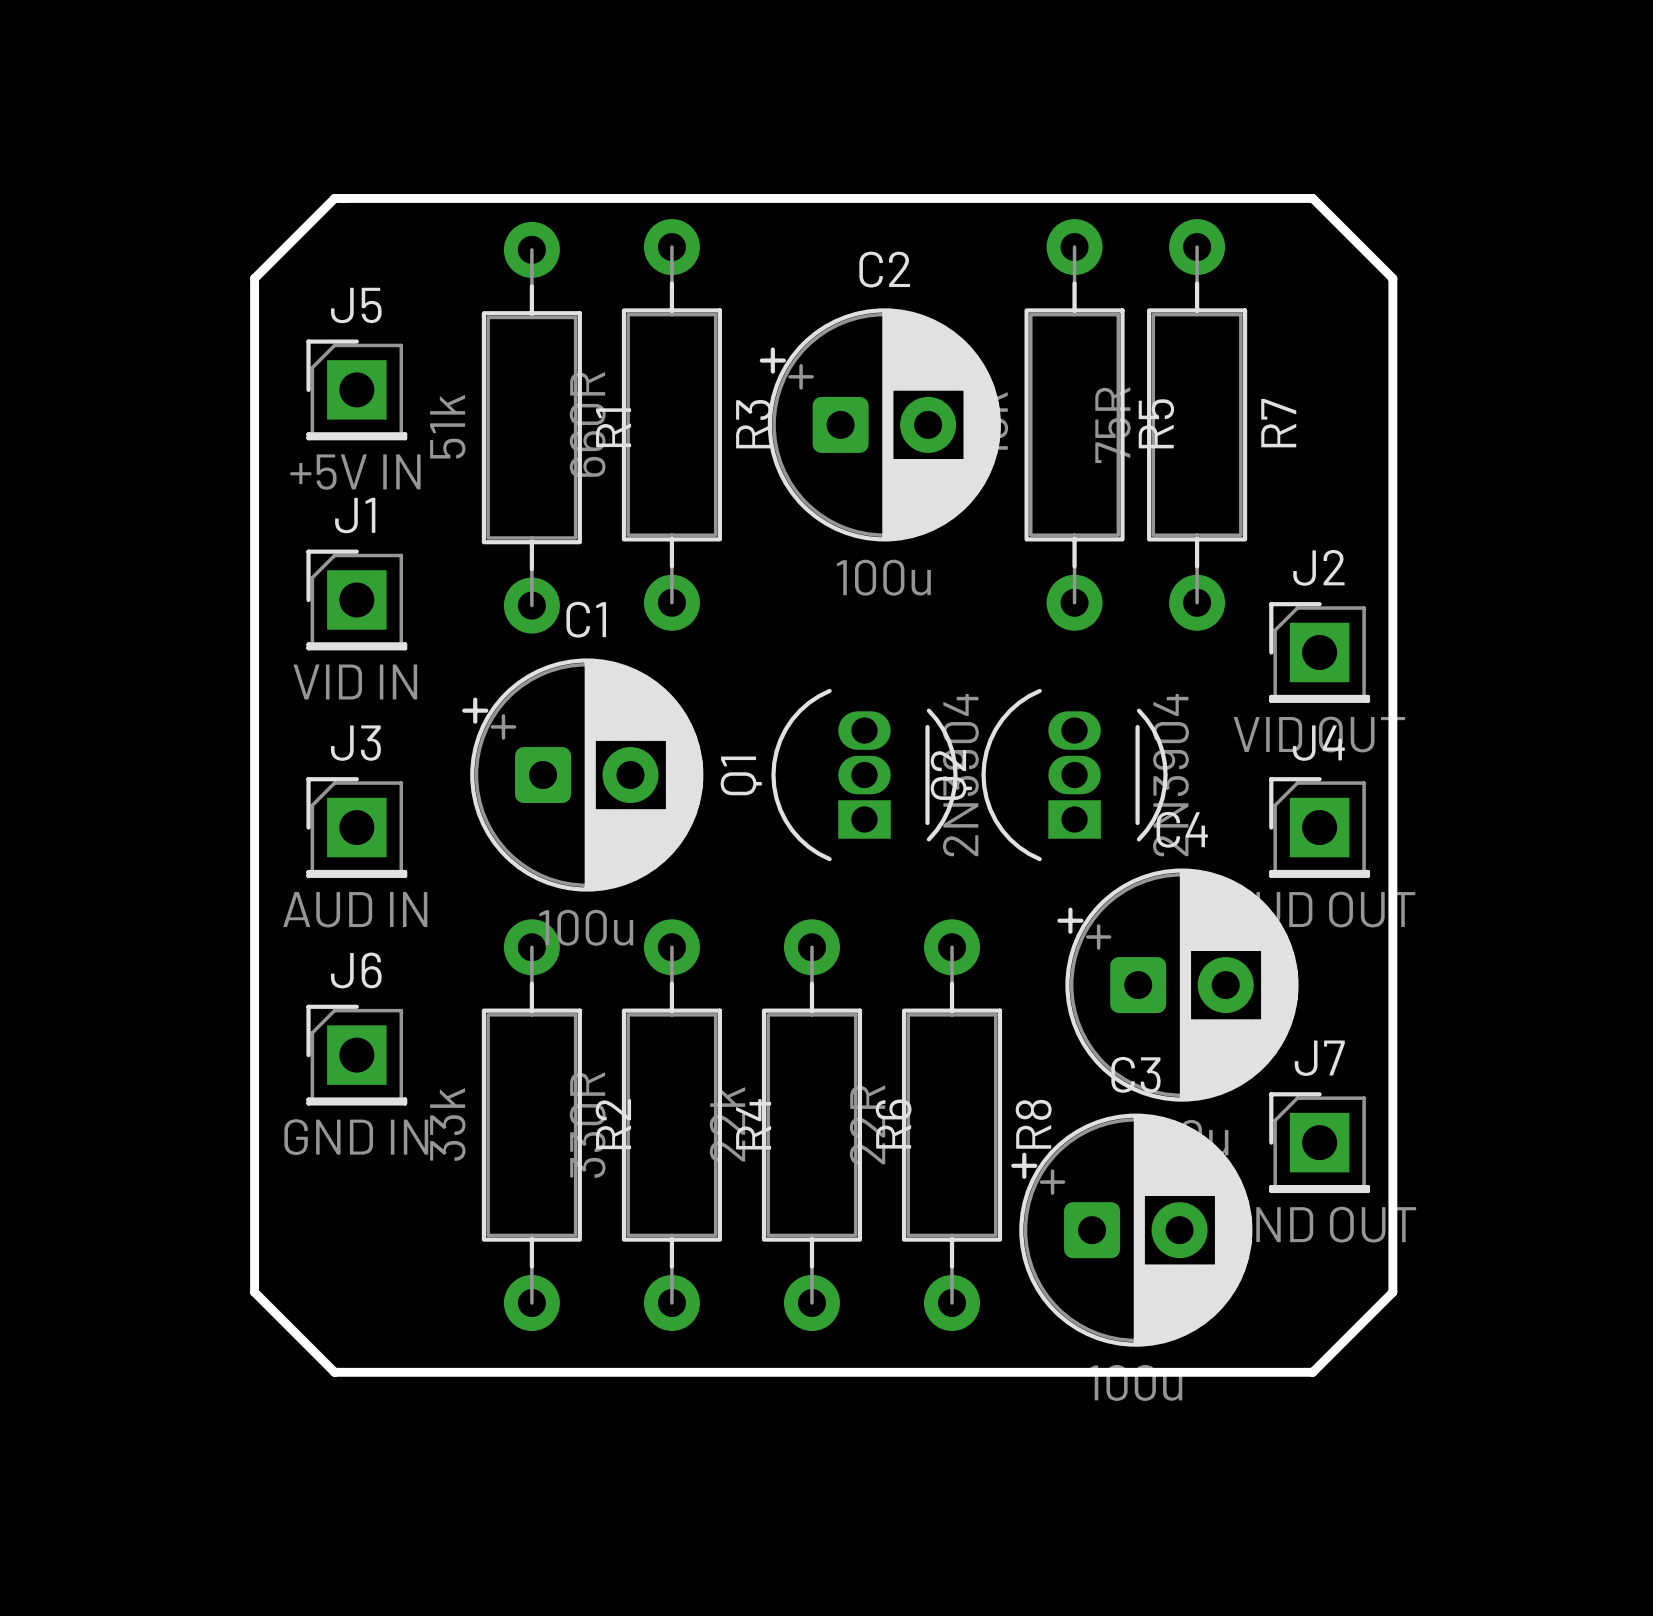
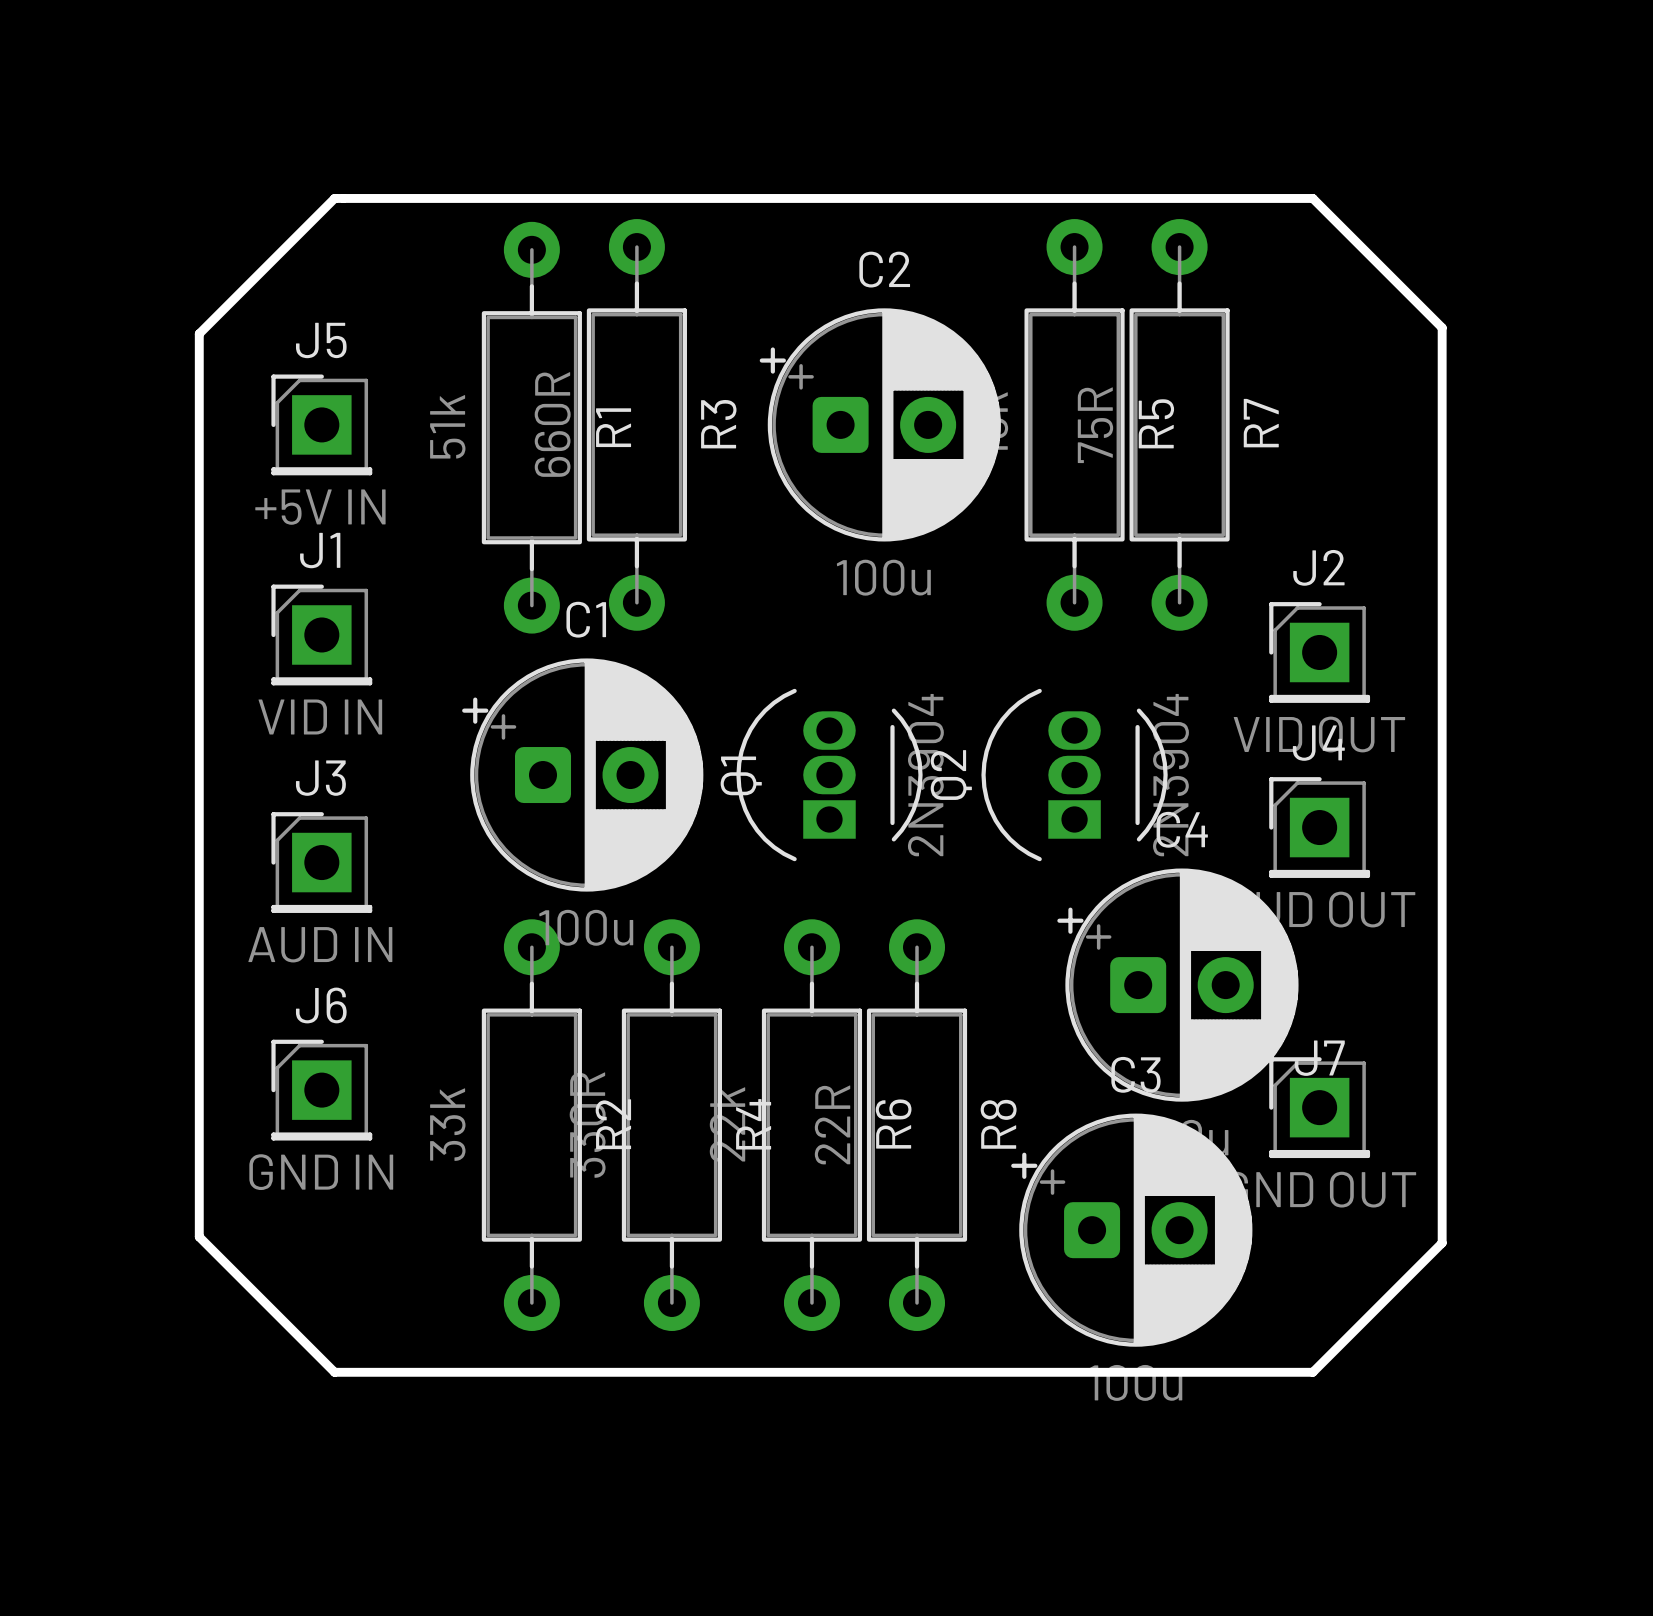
board edge: (254, 278) (254, 1292) -> (254, 278) (199, 333) (199, 1236) (254, 1292)
board edge: (1392, 278) (1392, 1292) -> (1392, 278) (1442, 327) (1442, 1242) (1392, 1292)
J5 position: (356, 389) -> (321, 424)
R3 position: (671, 424) -> (636, 424)
R7 position: (1197, 424) -> (1179, 424)
J1 position: (356, 599) -> (321, 634)
Q1 position: (864, 775) -> (829, 775)
J3 position: (356, 827) -> (321, 862)
J6 position: (356, 1055) -> (321, 1090)
R8 position: (952, 1125) -> (917, 1125)
J7 position: (1319, 1142) -> (1319, 1107)

